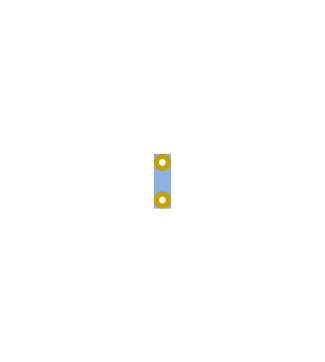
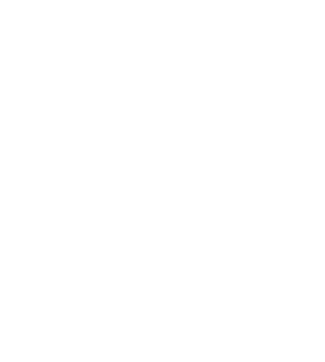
part: (162, 181) -> none

